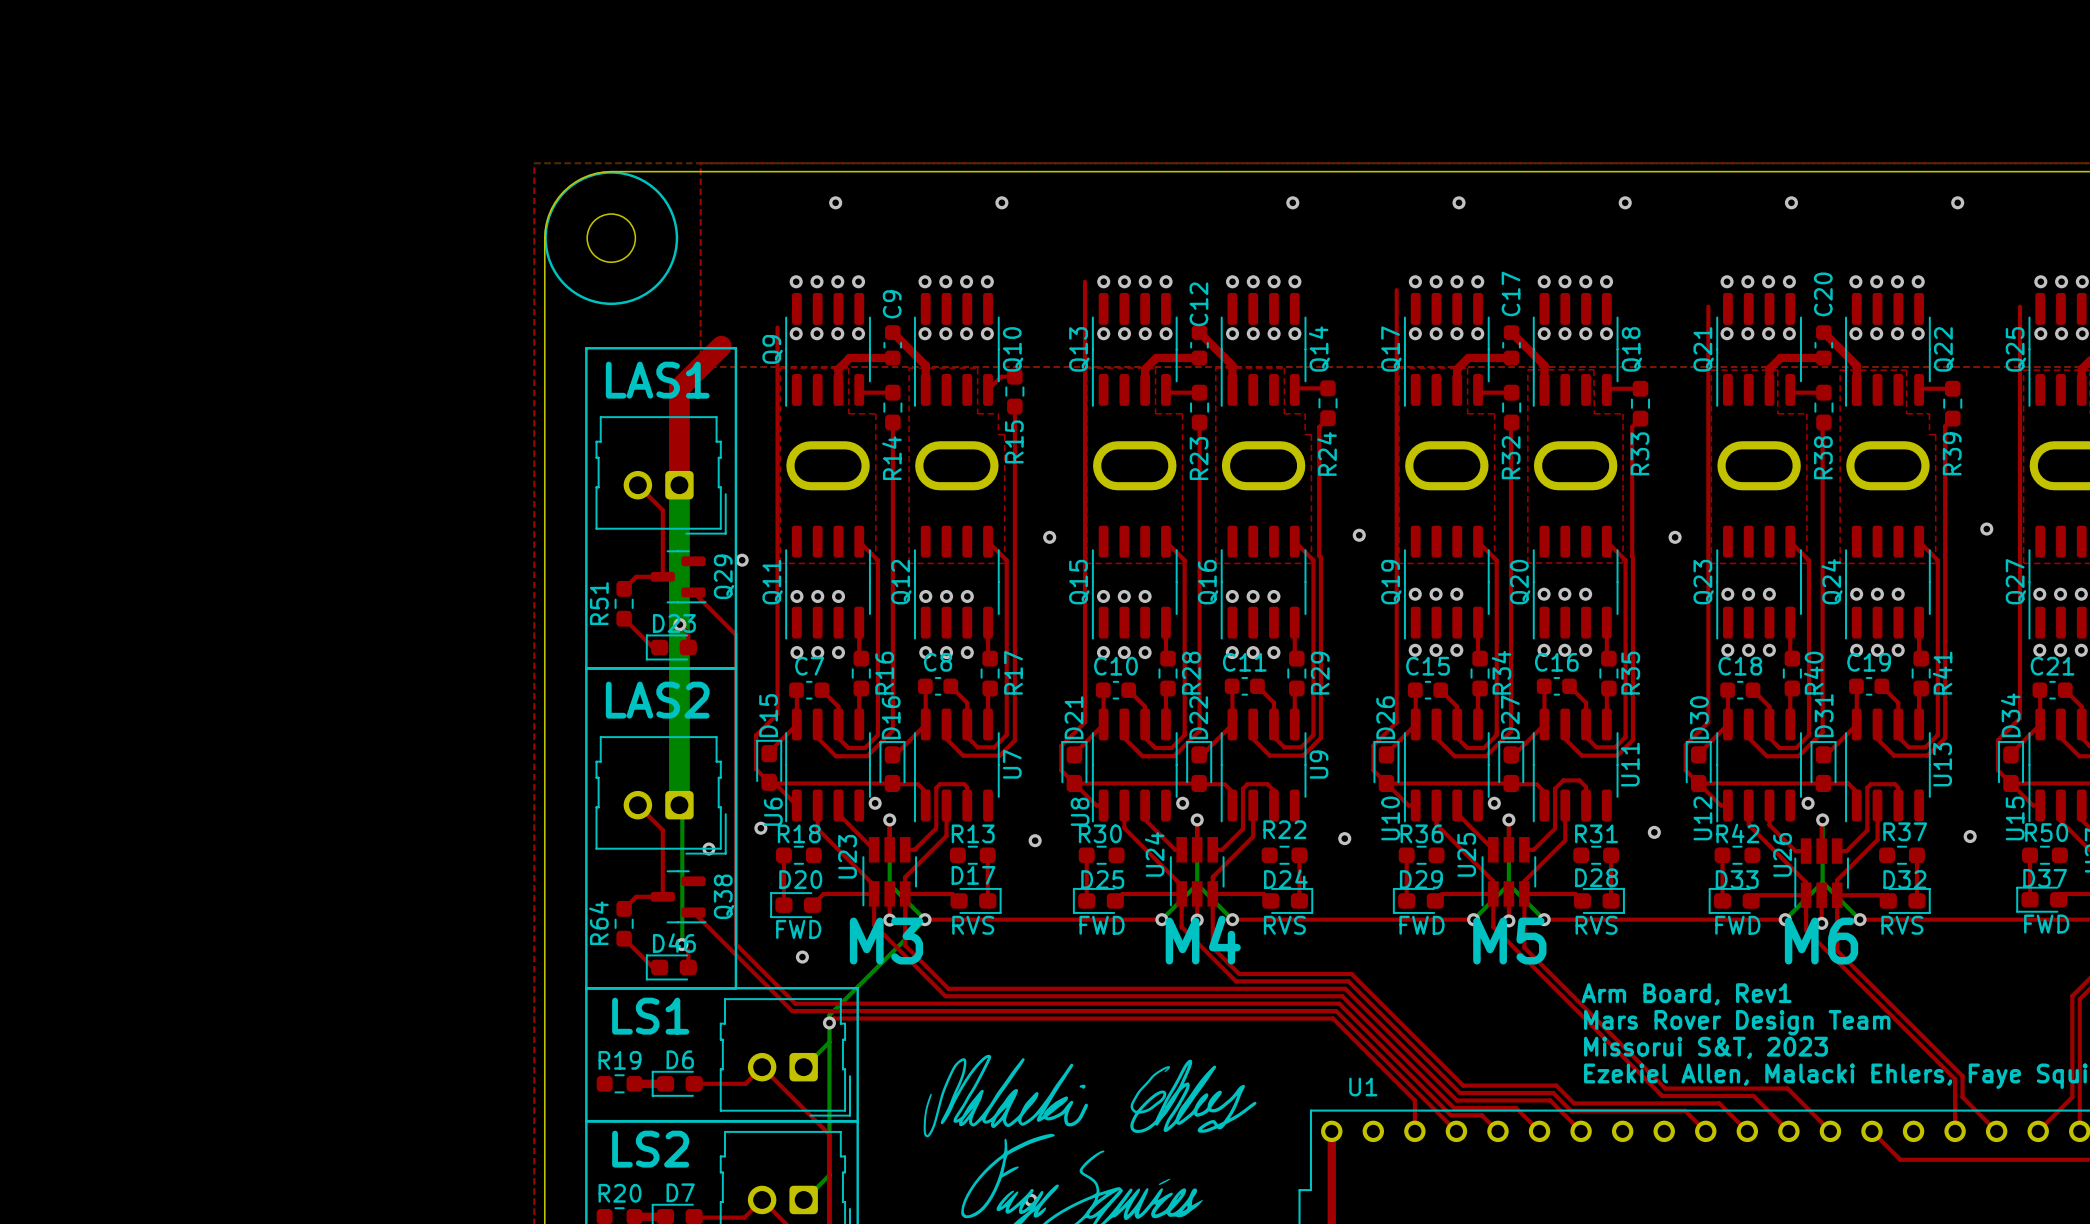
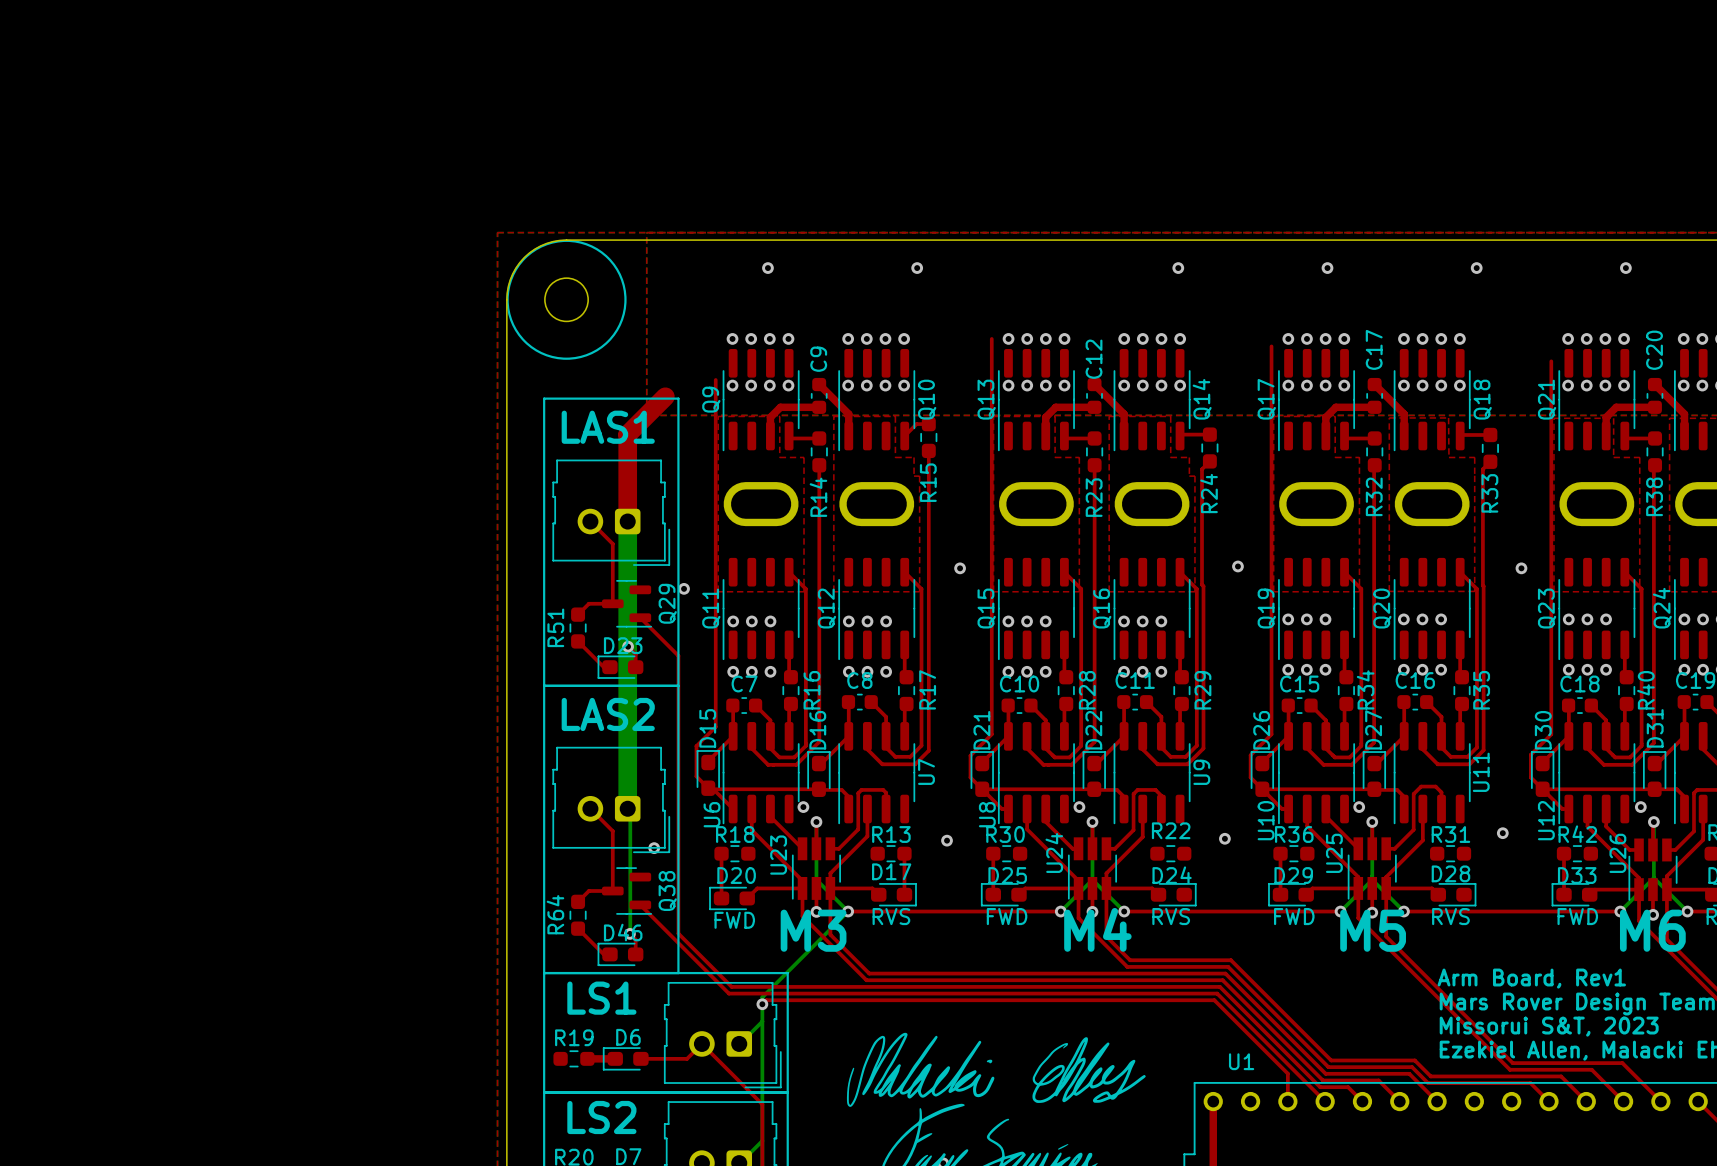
via: (760, 828) -> none
top track: (1299, 855) (1299, 900) -> none
top track: (1611, 855) (1611, 900) -> none
via: (802, 957) -> none

